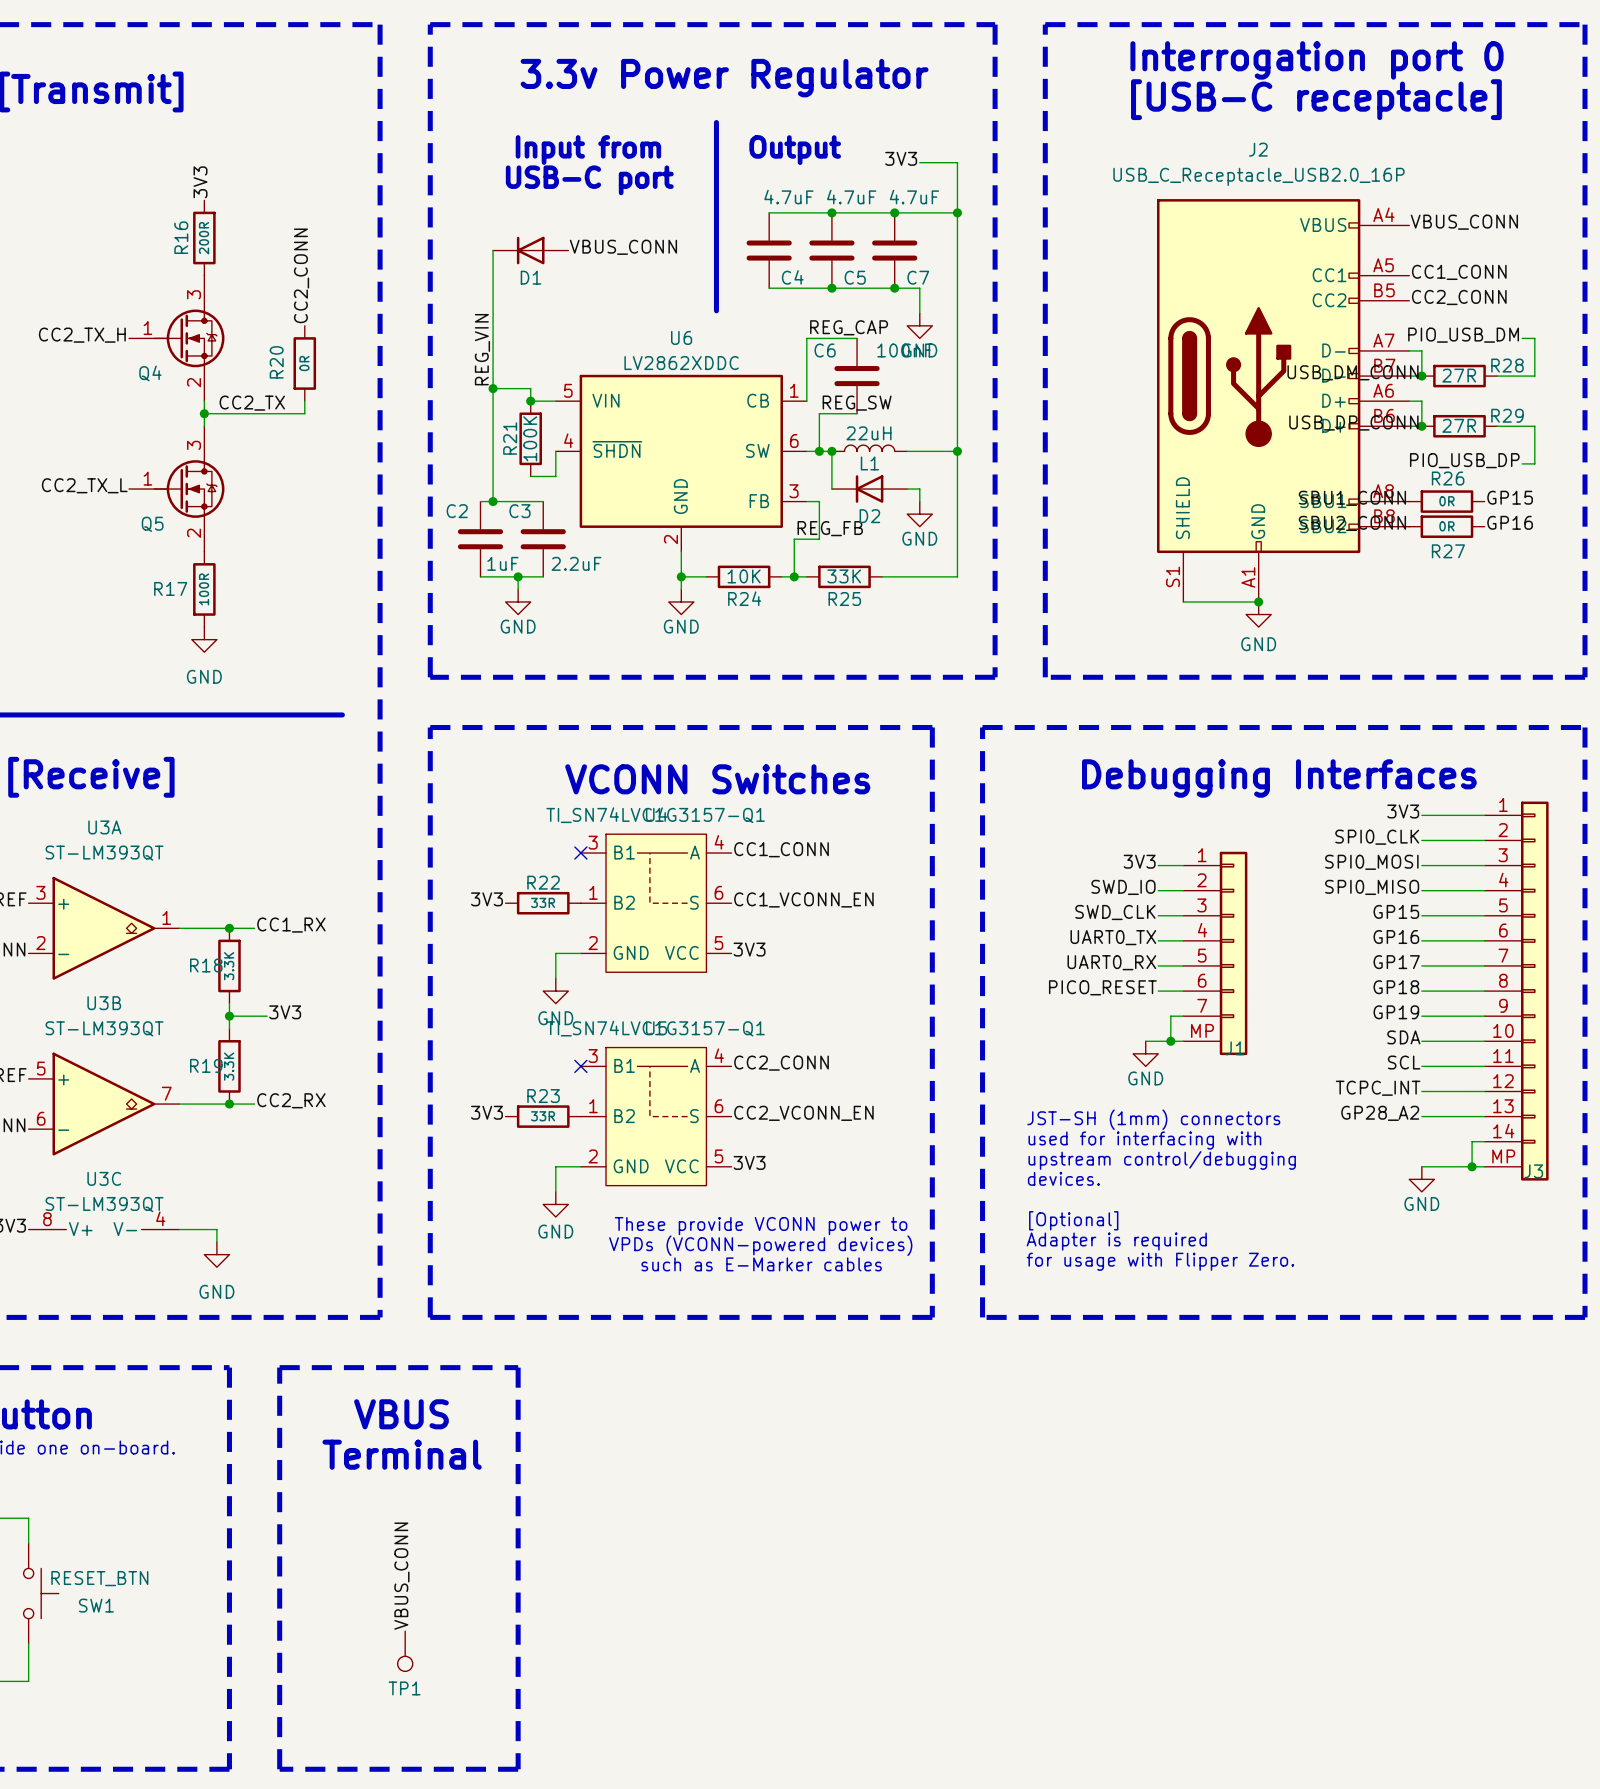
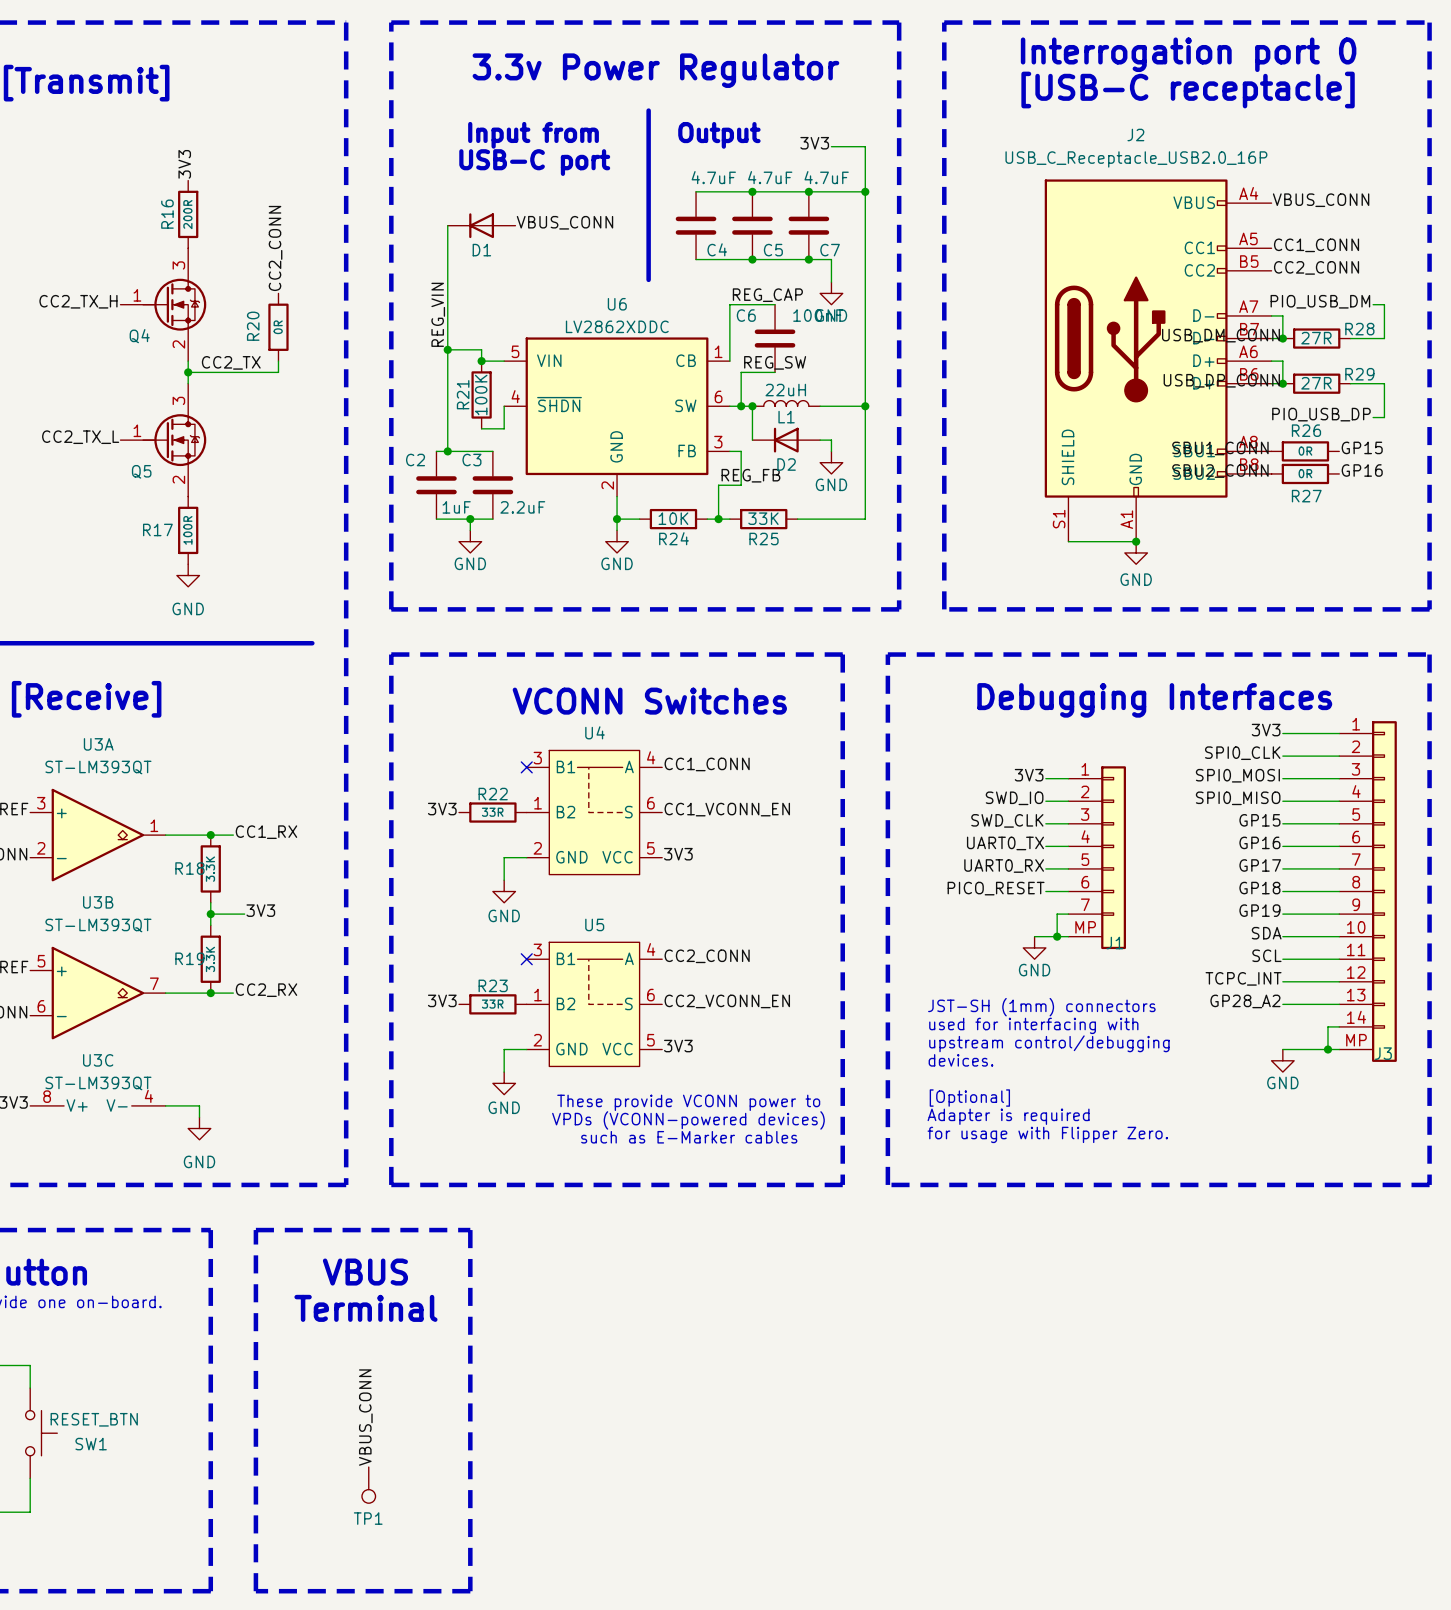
U4 value: TI_SN74LVC1G3157-Q1 (655, 815) -> none
U5 value: TI_SN74LVC1G3157-Q1 (655, 1028) -> none

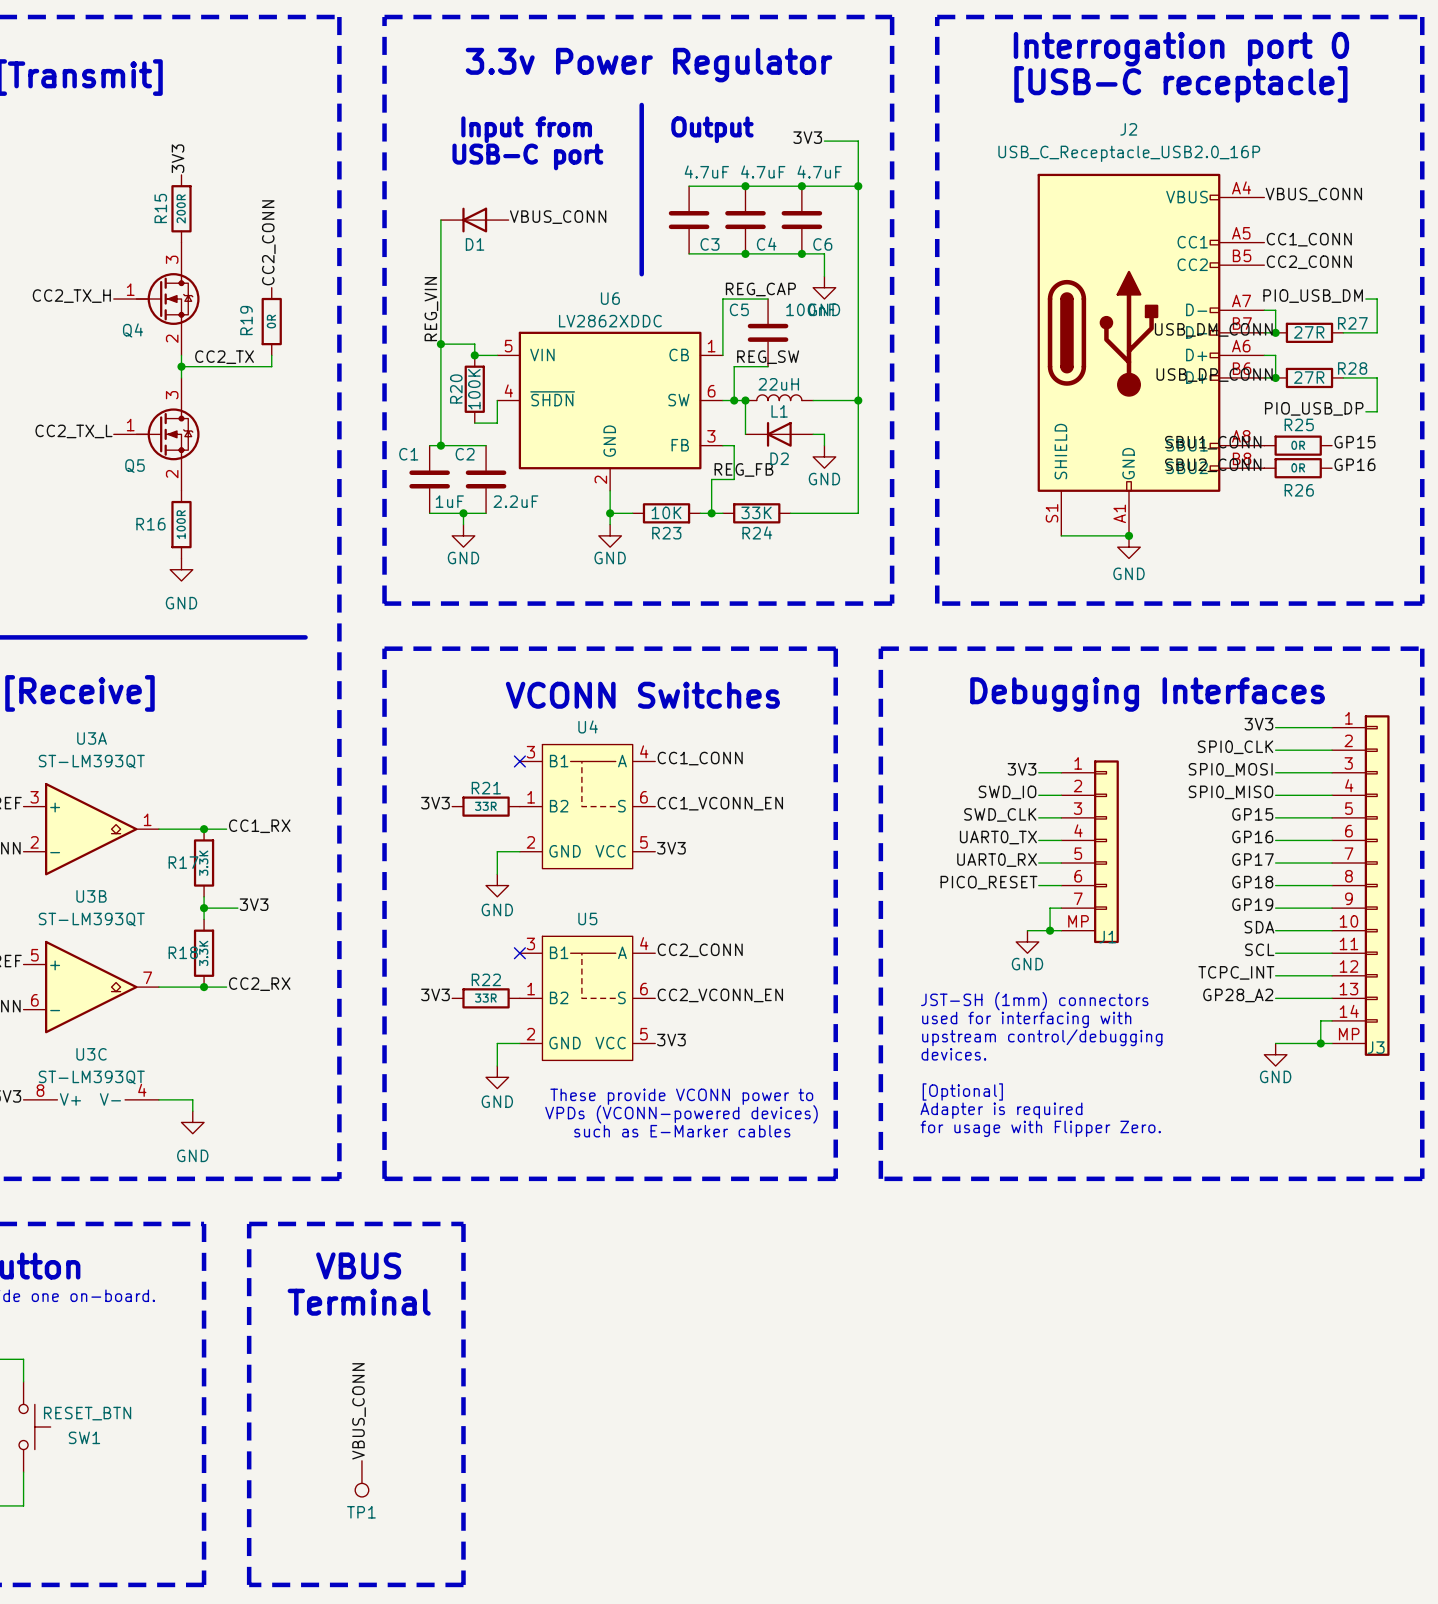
R16 name: R16 (167, 214) -> R15 (160, 208)
C4 name: C4 (717, 249) -> C3 (710, 244)
C5 name: C5 (773, 250) -> C4 (766, 244)
C7 name: C7 (830, 250) -> C6 (822, 244)
C6 name: C6 (746, 315) -> C5 (739, 309)
R20 name: R20 (253, 326) -> R19 (246, 320)
R28 name: R28 (1359, 329) -> R27 (1352, 323)
R29 name: R29 (1359, 374) -> R28 (1352, 368)
R21 name: R21 (463, 394) -> R20 (456, 388)
R26 name: R26 (1306, 430) -> R25 (1299, 424)
C2 name: C2 (415, 460) -> C1 (408, 454)
C3 name: C3 (471, 460) -> C2 (465, 454)
R27 name: R27 (1306, 496) -> R26 (1299, 490)
R17 name: R17 (157, 529) -> R16 (150, 524)
R24 name: R24 (673, 538) -> R23 (666, 533)
R25 name: R25 (764, 539) -> R24 (757, 532)
R22 name: R22 (493, 794) -> R21 (486, 788)
R18 name: R18 (189, 868) -> R17 (183, 862)
R19 name: R19 (189, 958) -> R18 (183, 952)
R23 name: R23 (493, 985) -> R22 (486, 979)

